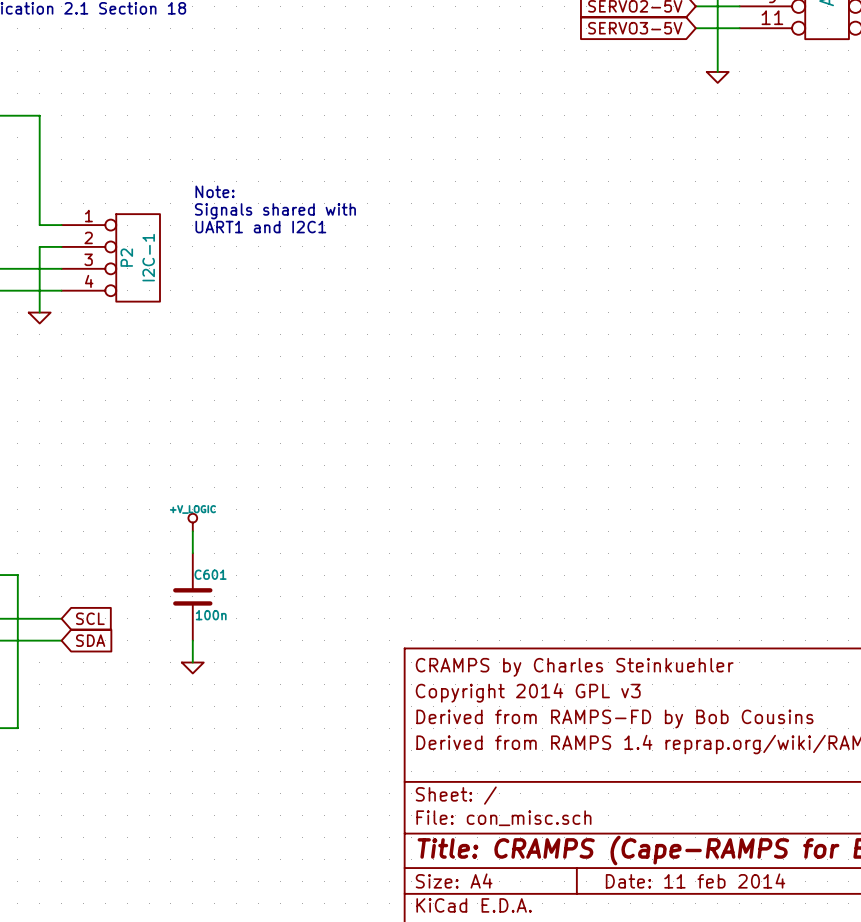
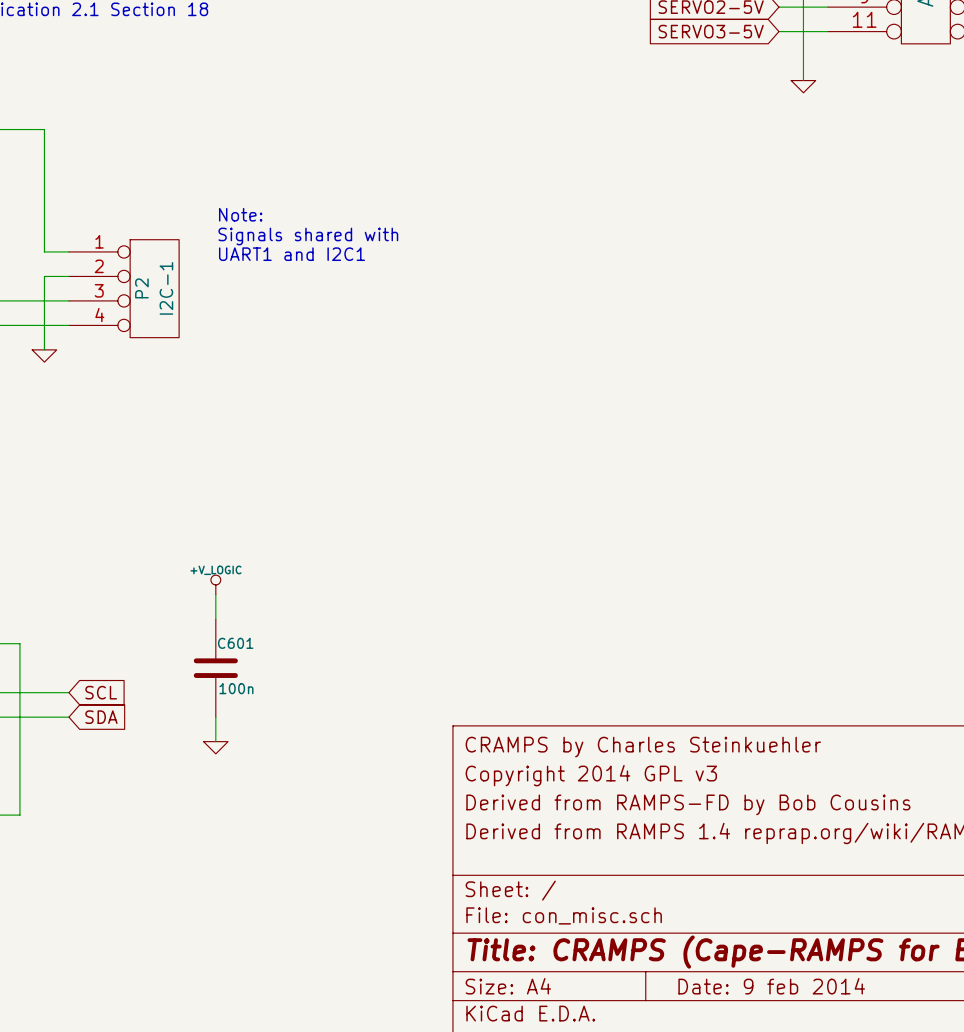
title block: Date: 11 feb 2014 (695, 881) -> Date: 9 feb 2014 (771, 986)

